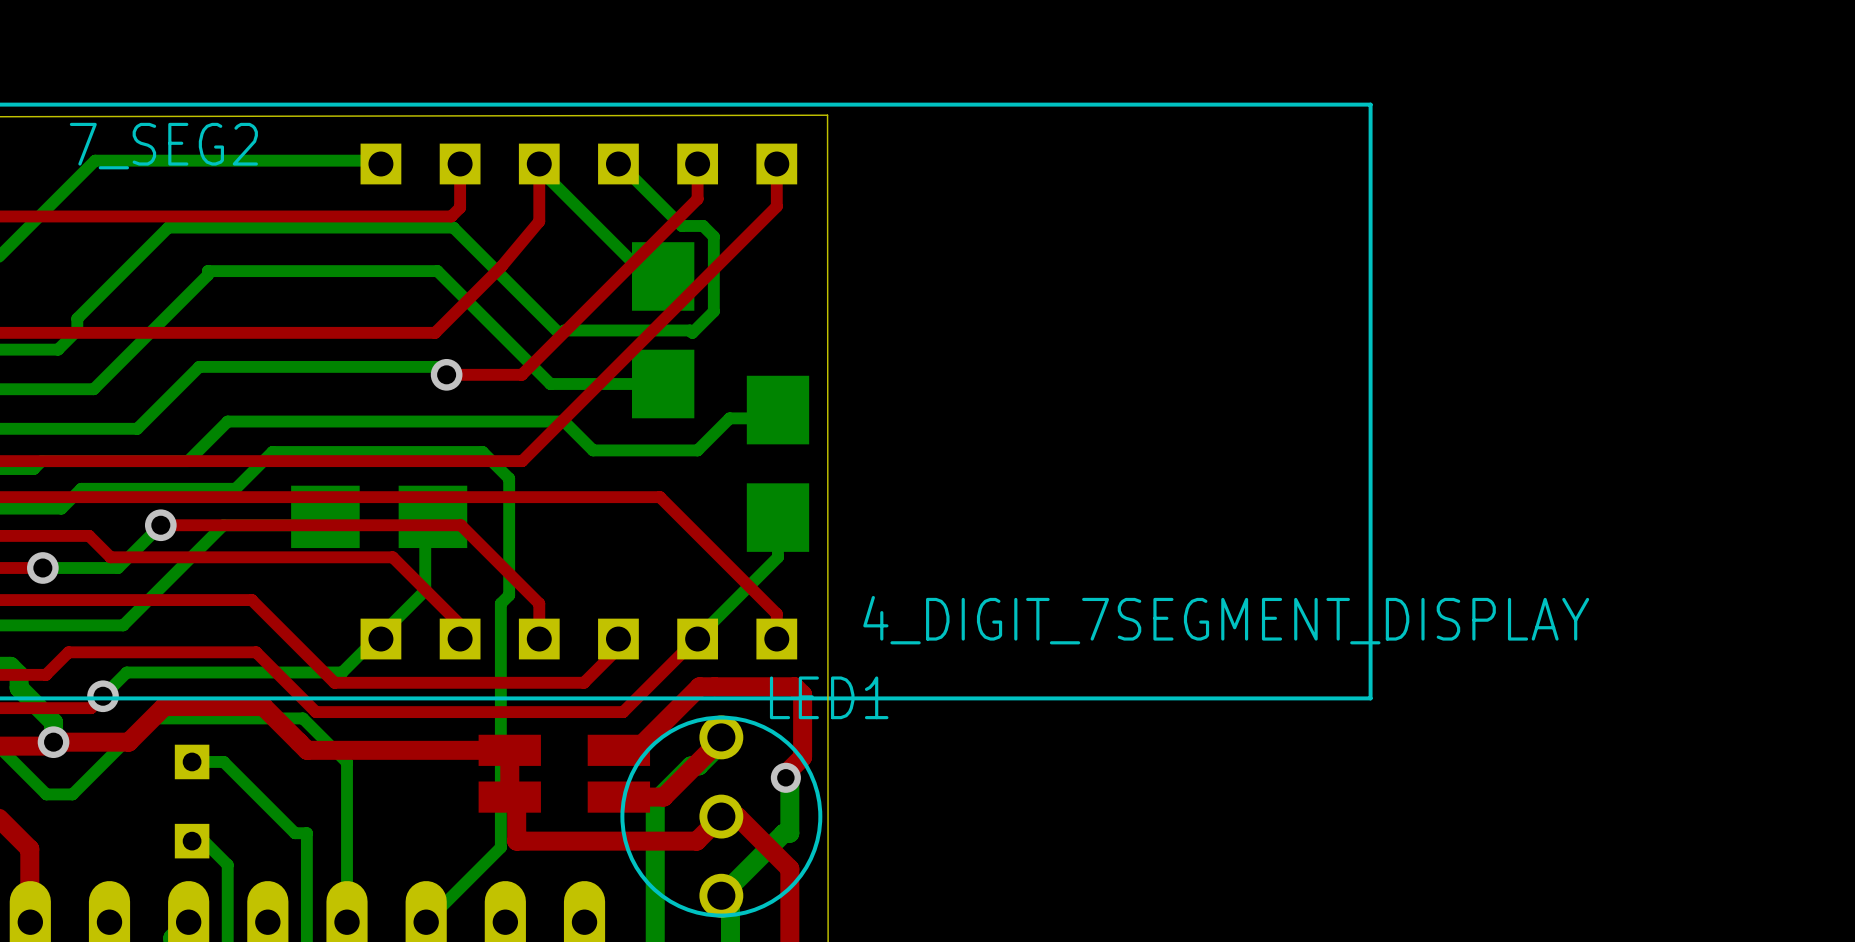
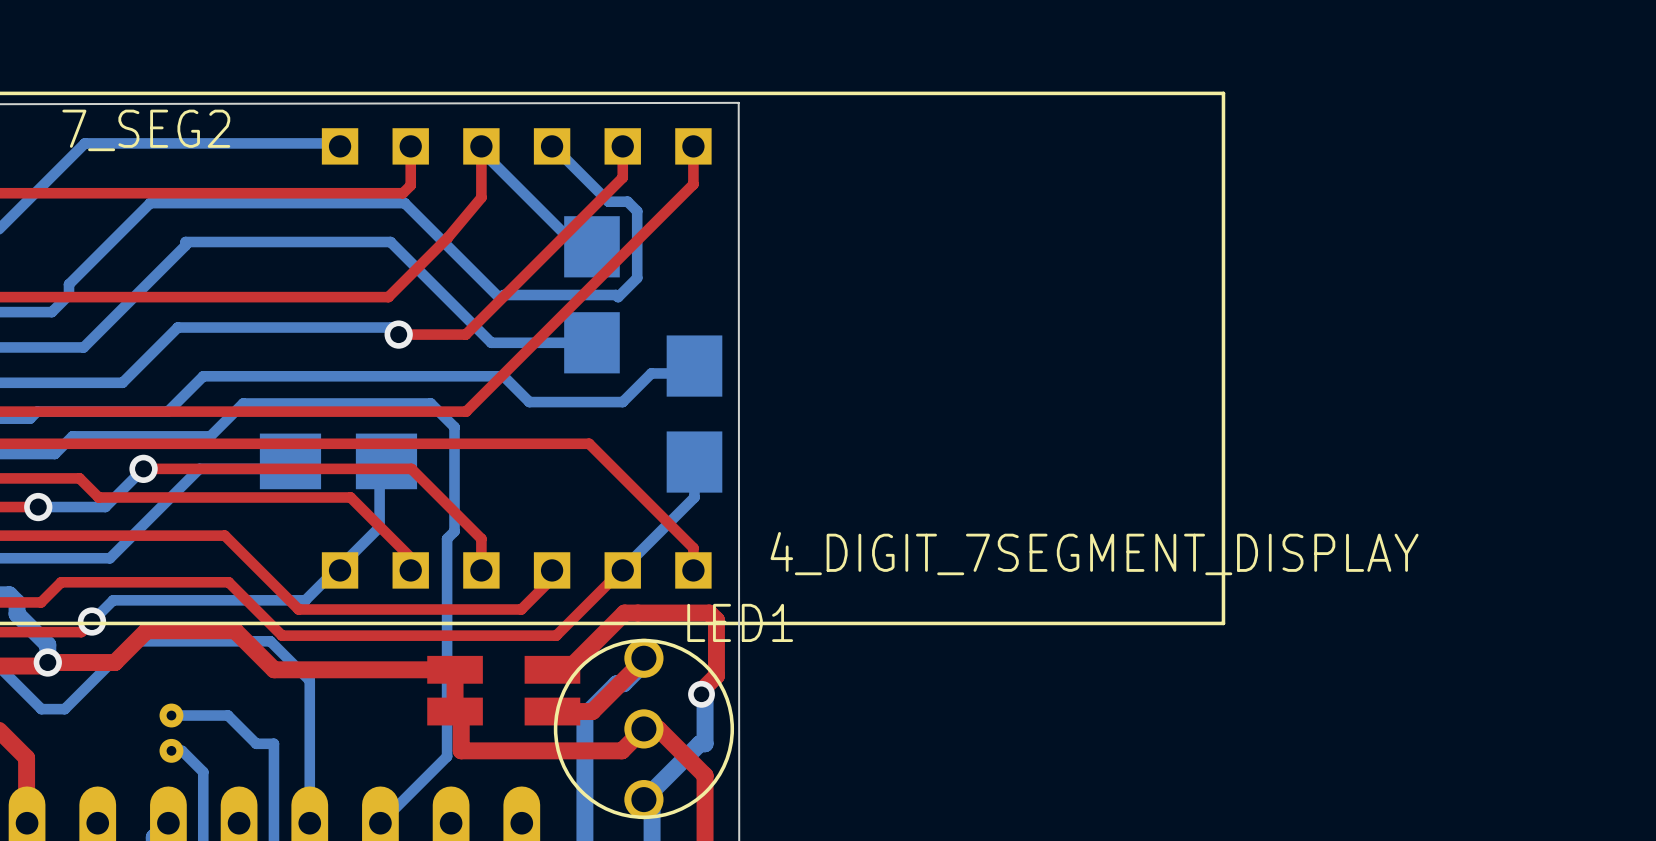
part footprint: [174, 744, 210, 859] -> [159, 703, 184, 763]
bottom track: (192, 761) (223, 761) (295, 833) -> (171, 715) (228, 715) (256, 743) (263, 743)

